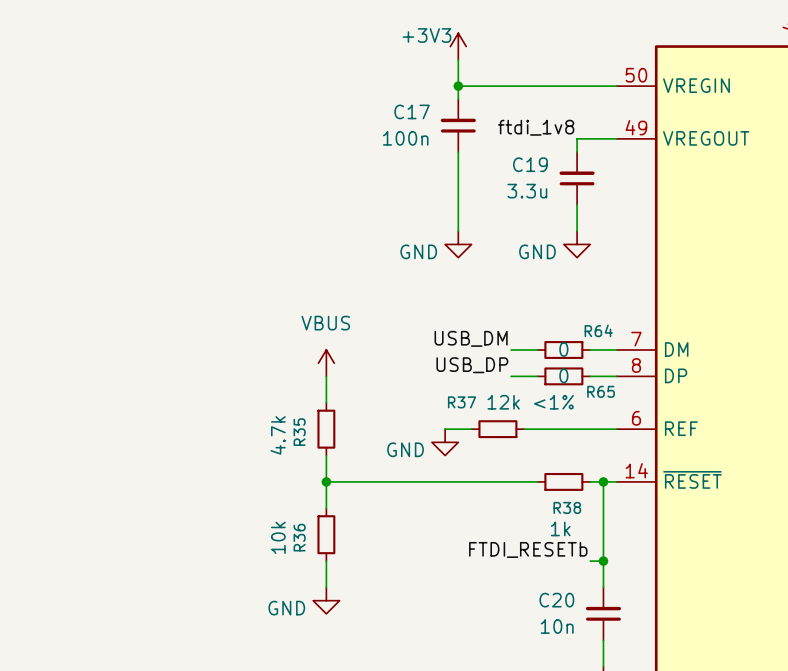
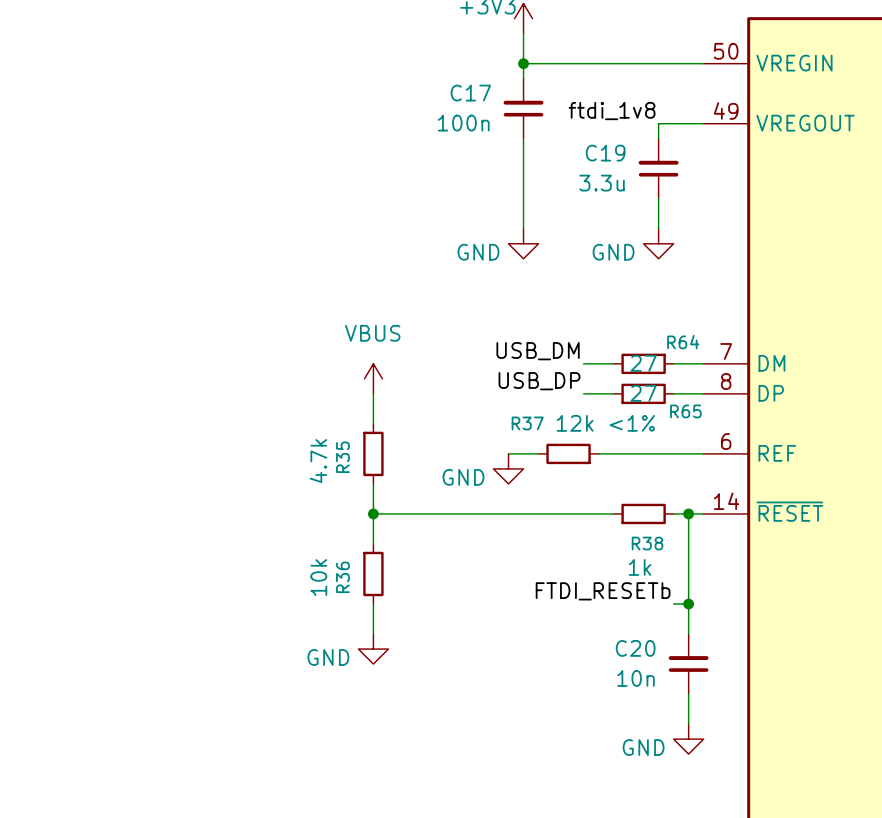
R64 value: 0 (563, 349) -> 27 (643, 363)
R65 value: 0 (563, 375) -> 27 (643, 393)

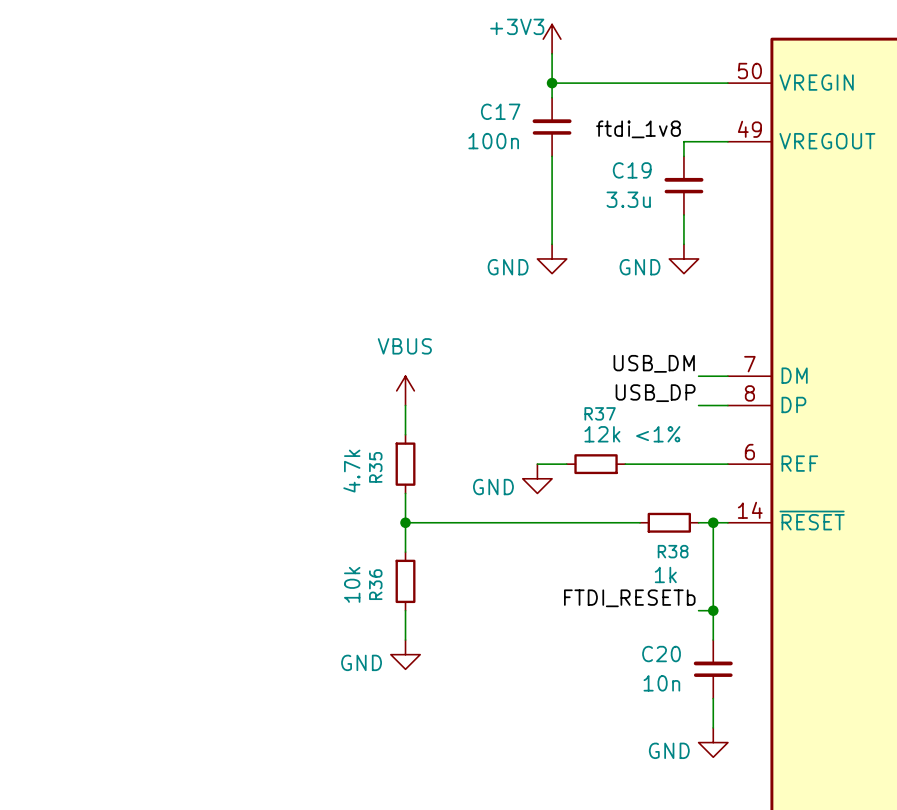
label position: USB_DM (538, 351) -> USB_DM (654, 363)
wire: (583, 363) (613, 363) -> none
R64: 27 (643, 363) -> none
label position: USB_DP (539, 381) -> USB_DP (655, 393)
wire: (583, 393) (613, 393) -> none
R65: 27 (643, 393) -> none
R37 name position: R37 (527, 423) -> R37 (600, 413)

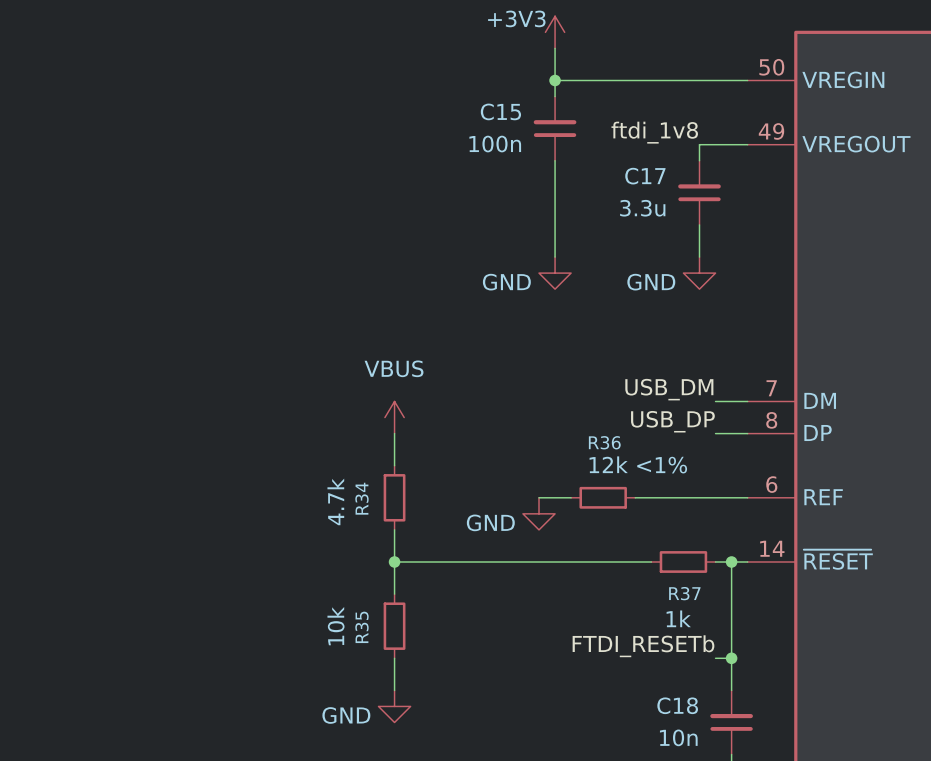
C17 name: C17 (500, 111) -> C15 (500, 111)
C19 name: C19 (632, 170) -> C17 (645, 176)
R37 name: R37 (600, 413) -> R36 (604, 442)
R35 name: R35 (375, 467) -> R34 (361, 498)
R38 name: R38 (673, 551) -> R37 (684, 593)
R36 name: R36 (375, 584) -> R35 (361, 627)
C20 name: C20 (661, 654) -> C18 (677, 705)

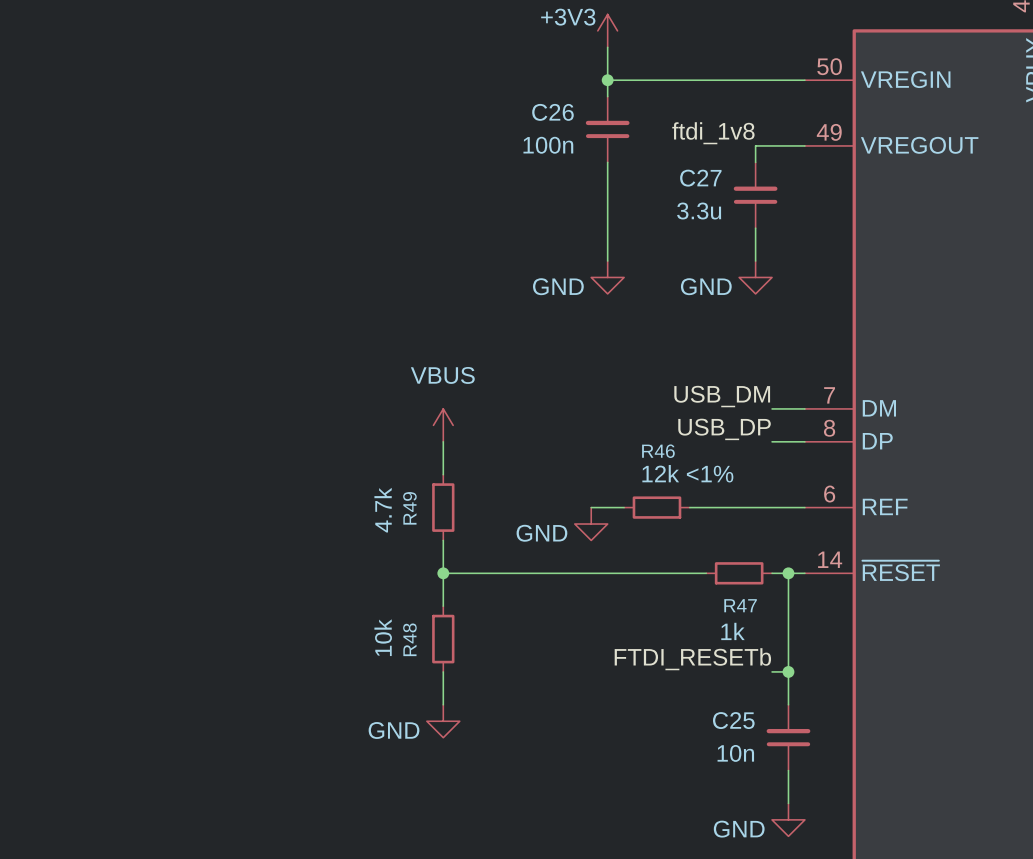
C15 name: C15 (500, 111) -> C26 (552, 112)
C17 name: C17 (645, 176) -> C27 (700, 178)
R36 name: R36 (604, 442) -> R46 (658, 451)
R34 name: R34 (361, 498) -> R49 (409, 508)
R37 name: R37 (684, 593) -> R47 (740, 605)
R35 name: R35 (361, 627) -> R48 (409, 639)
C18 name: C18 (677, 705) -> C25 (733, 720)

